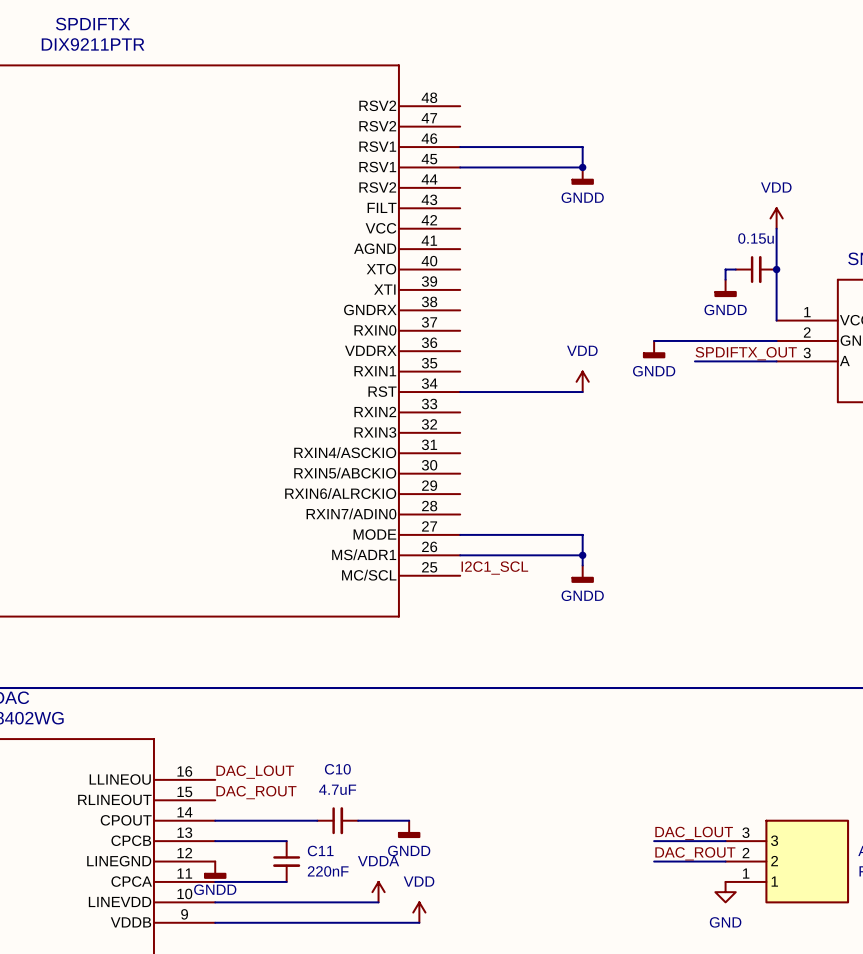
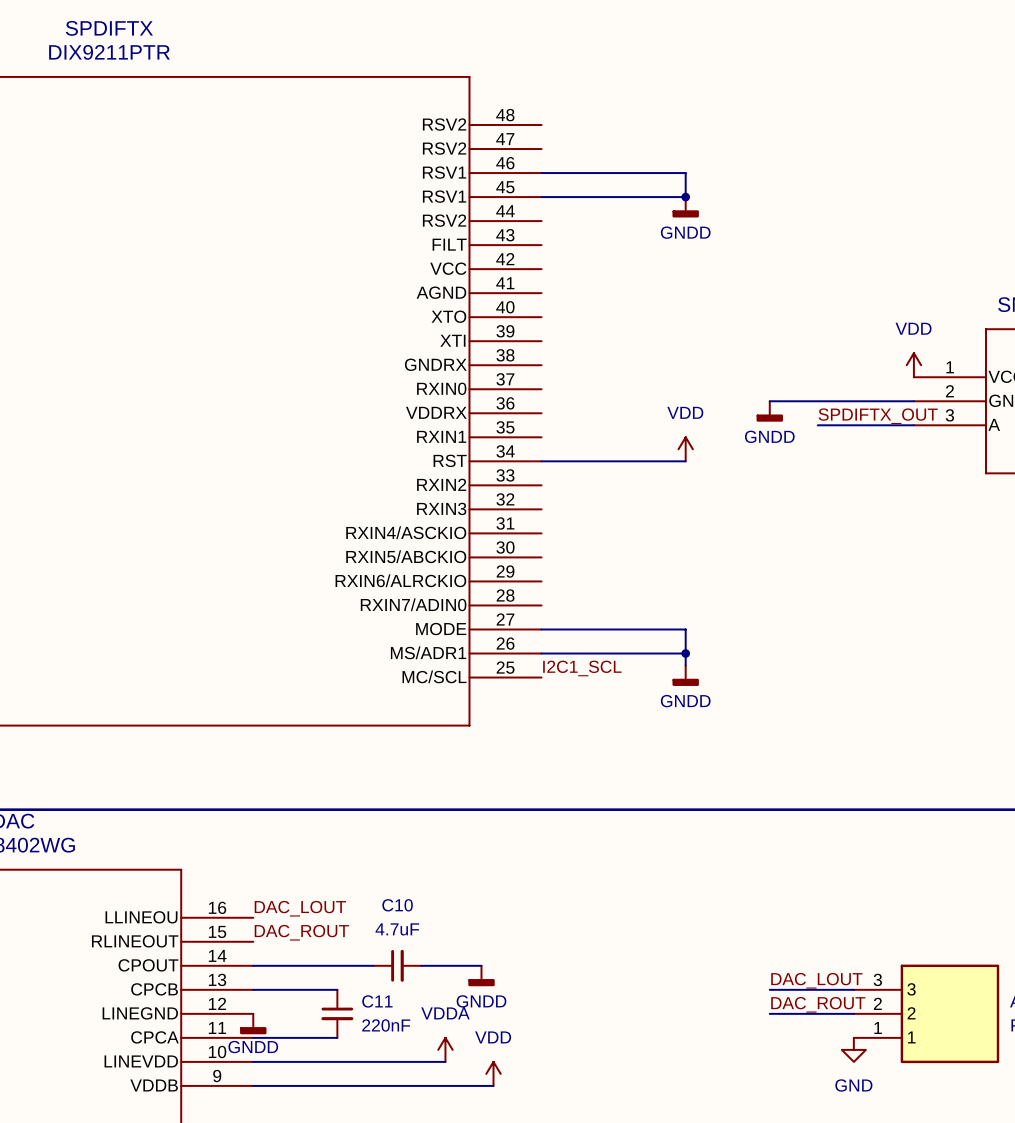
power symbol position: VDD (776, 218) -> VDD (913, 365)
wire: (776, 228) (776, 320) -> none
wire: (735, 269) (725, 269) (725, 279) -> none
part: 0.15u (756, 269) -> none
junction: (776, 269) -> none
power symbol: GNDD (725, 288) -> none

